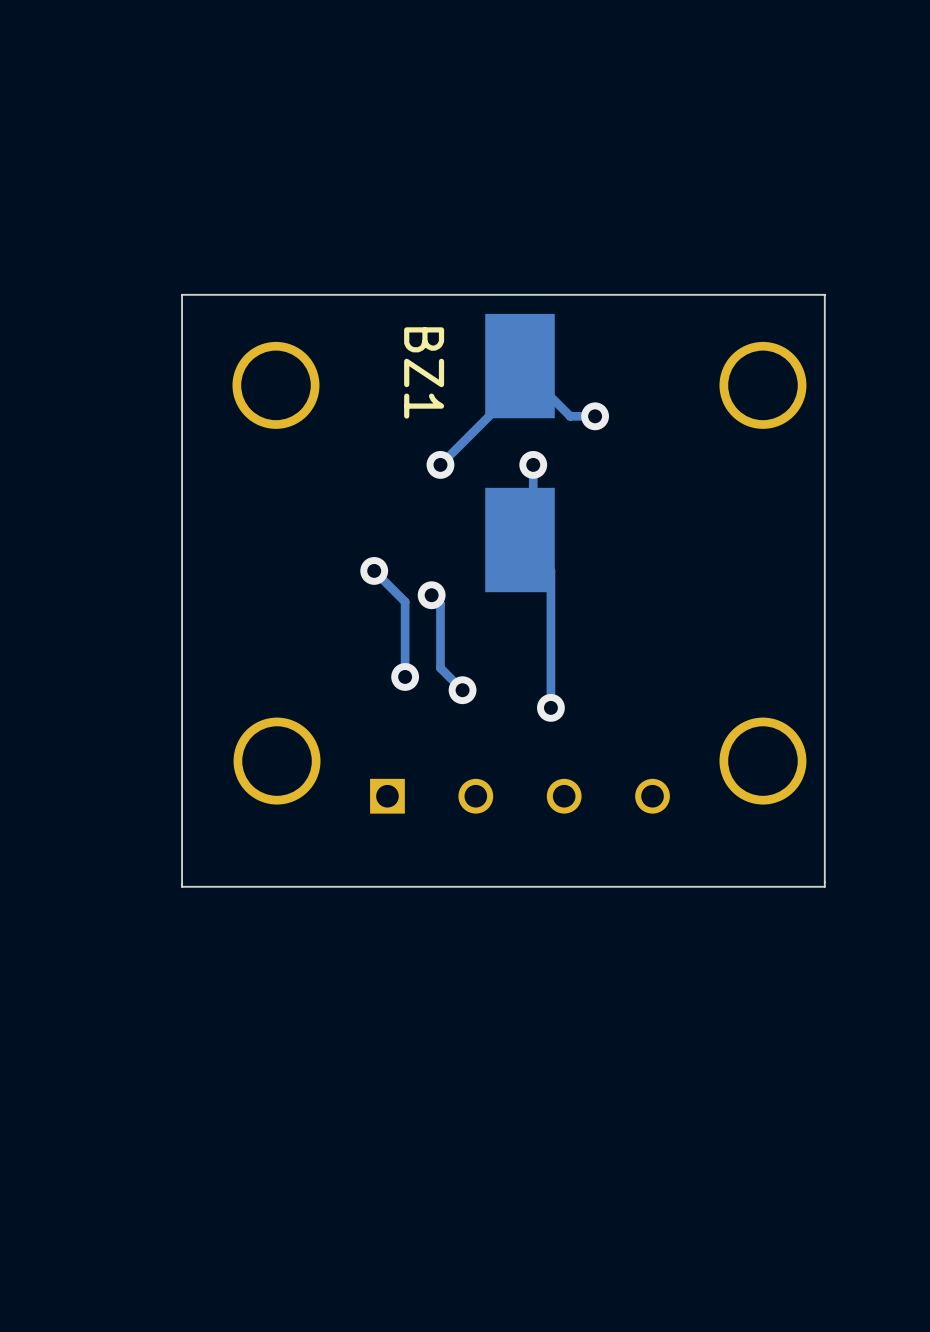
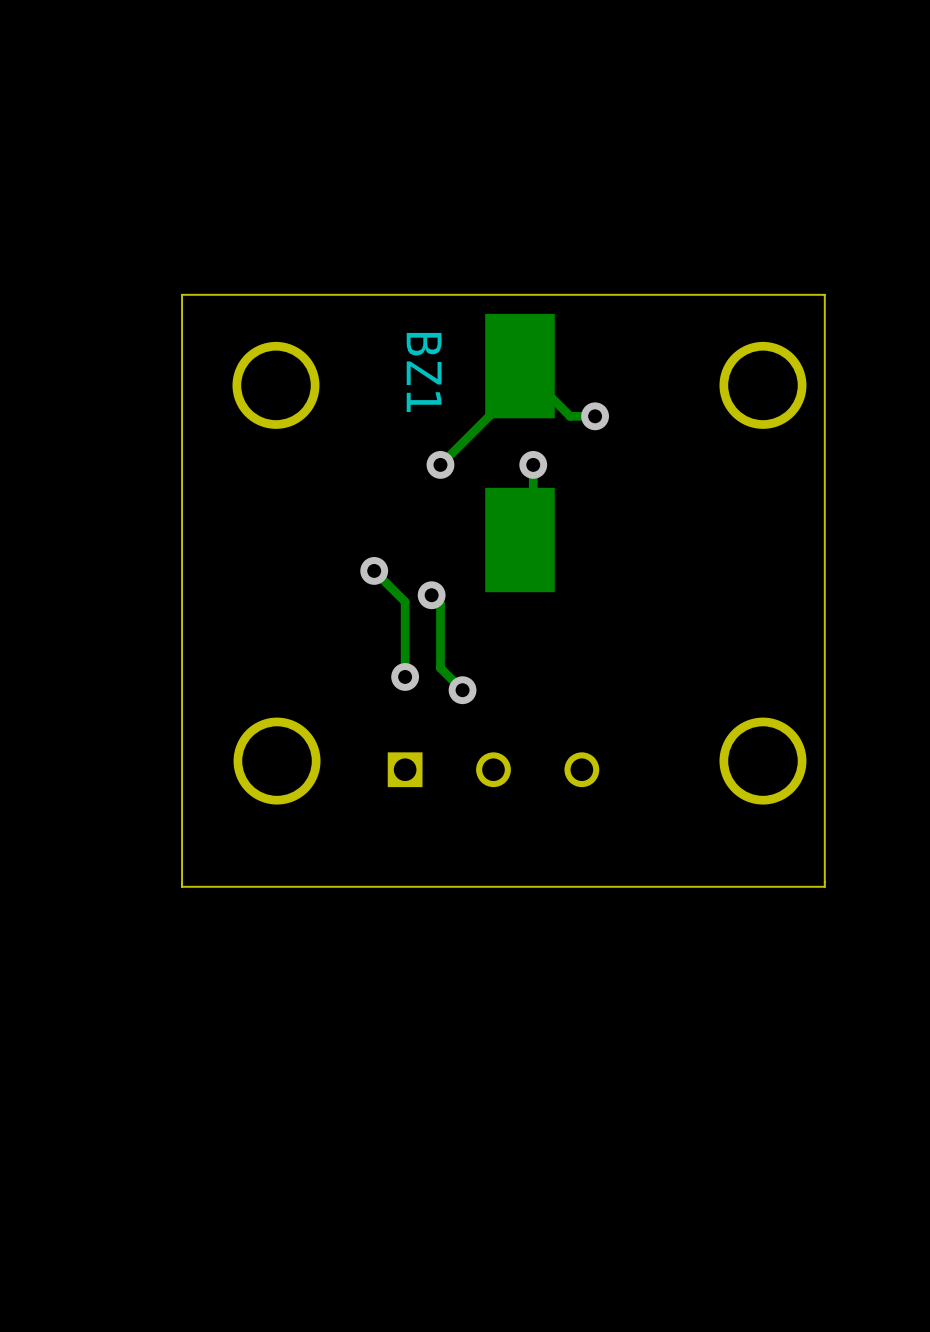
track: (519, 540) (550, 570) (550, 707) -> none
via: (550, 707) -> none
part: none -> (493, 769)
part: (519, 796) -> none

